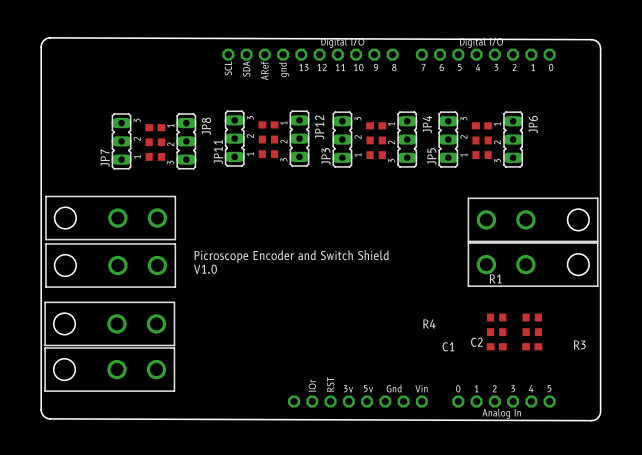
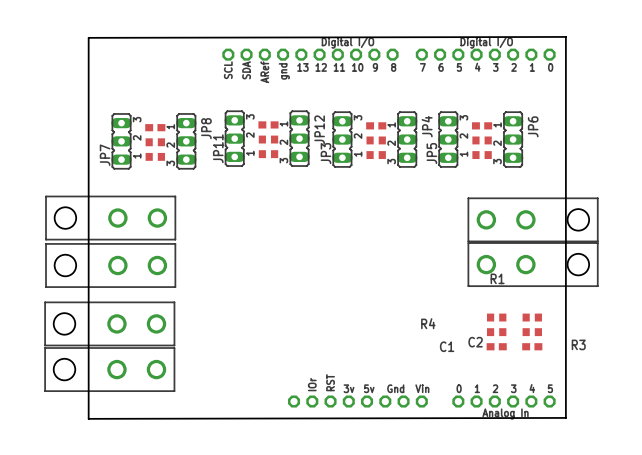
board edge: (50, 37) (591, 39) (597, 41) (600, 48) (599, 416) (591, 420) (50, 418) (44, 416) (41, 409) (41, 47) (43, 40) (50, 37) -> (565, 36) (88, 37) (88, 418) (565, 417) (565, 36)
text: Picroscope Encoder and Switch Shield (291, 256) -> none
text: V1.0 (205, 269) -> none

